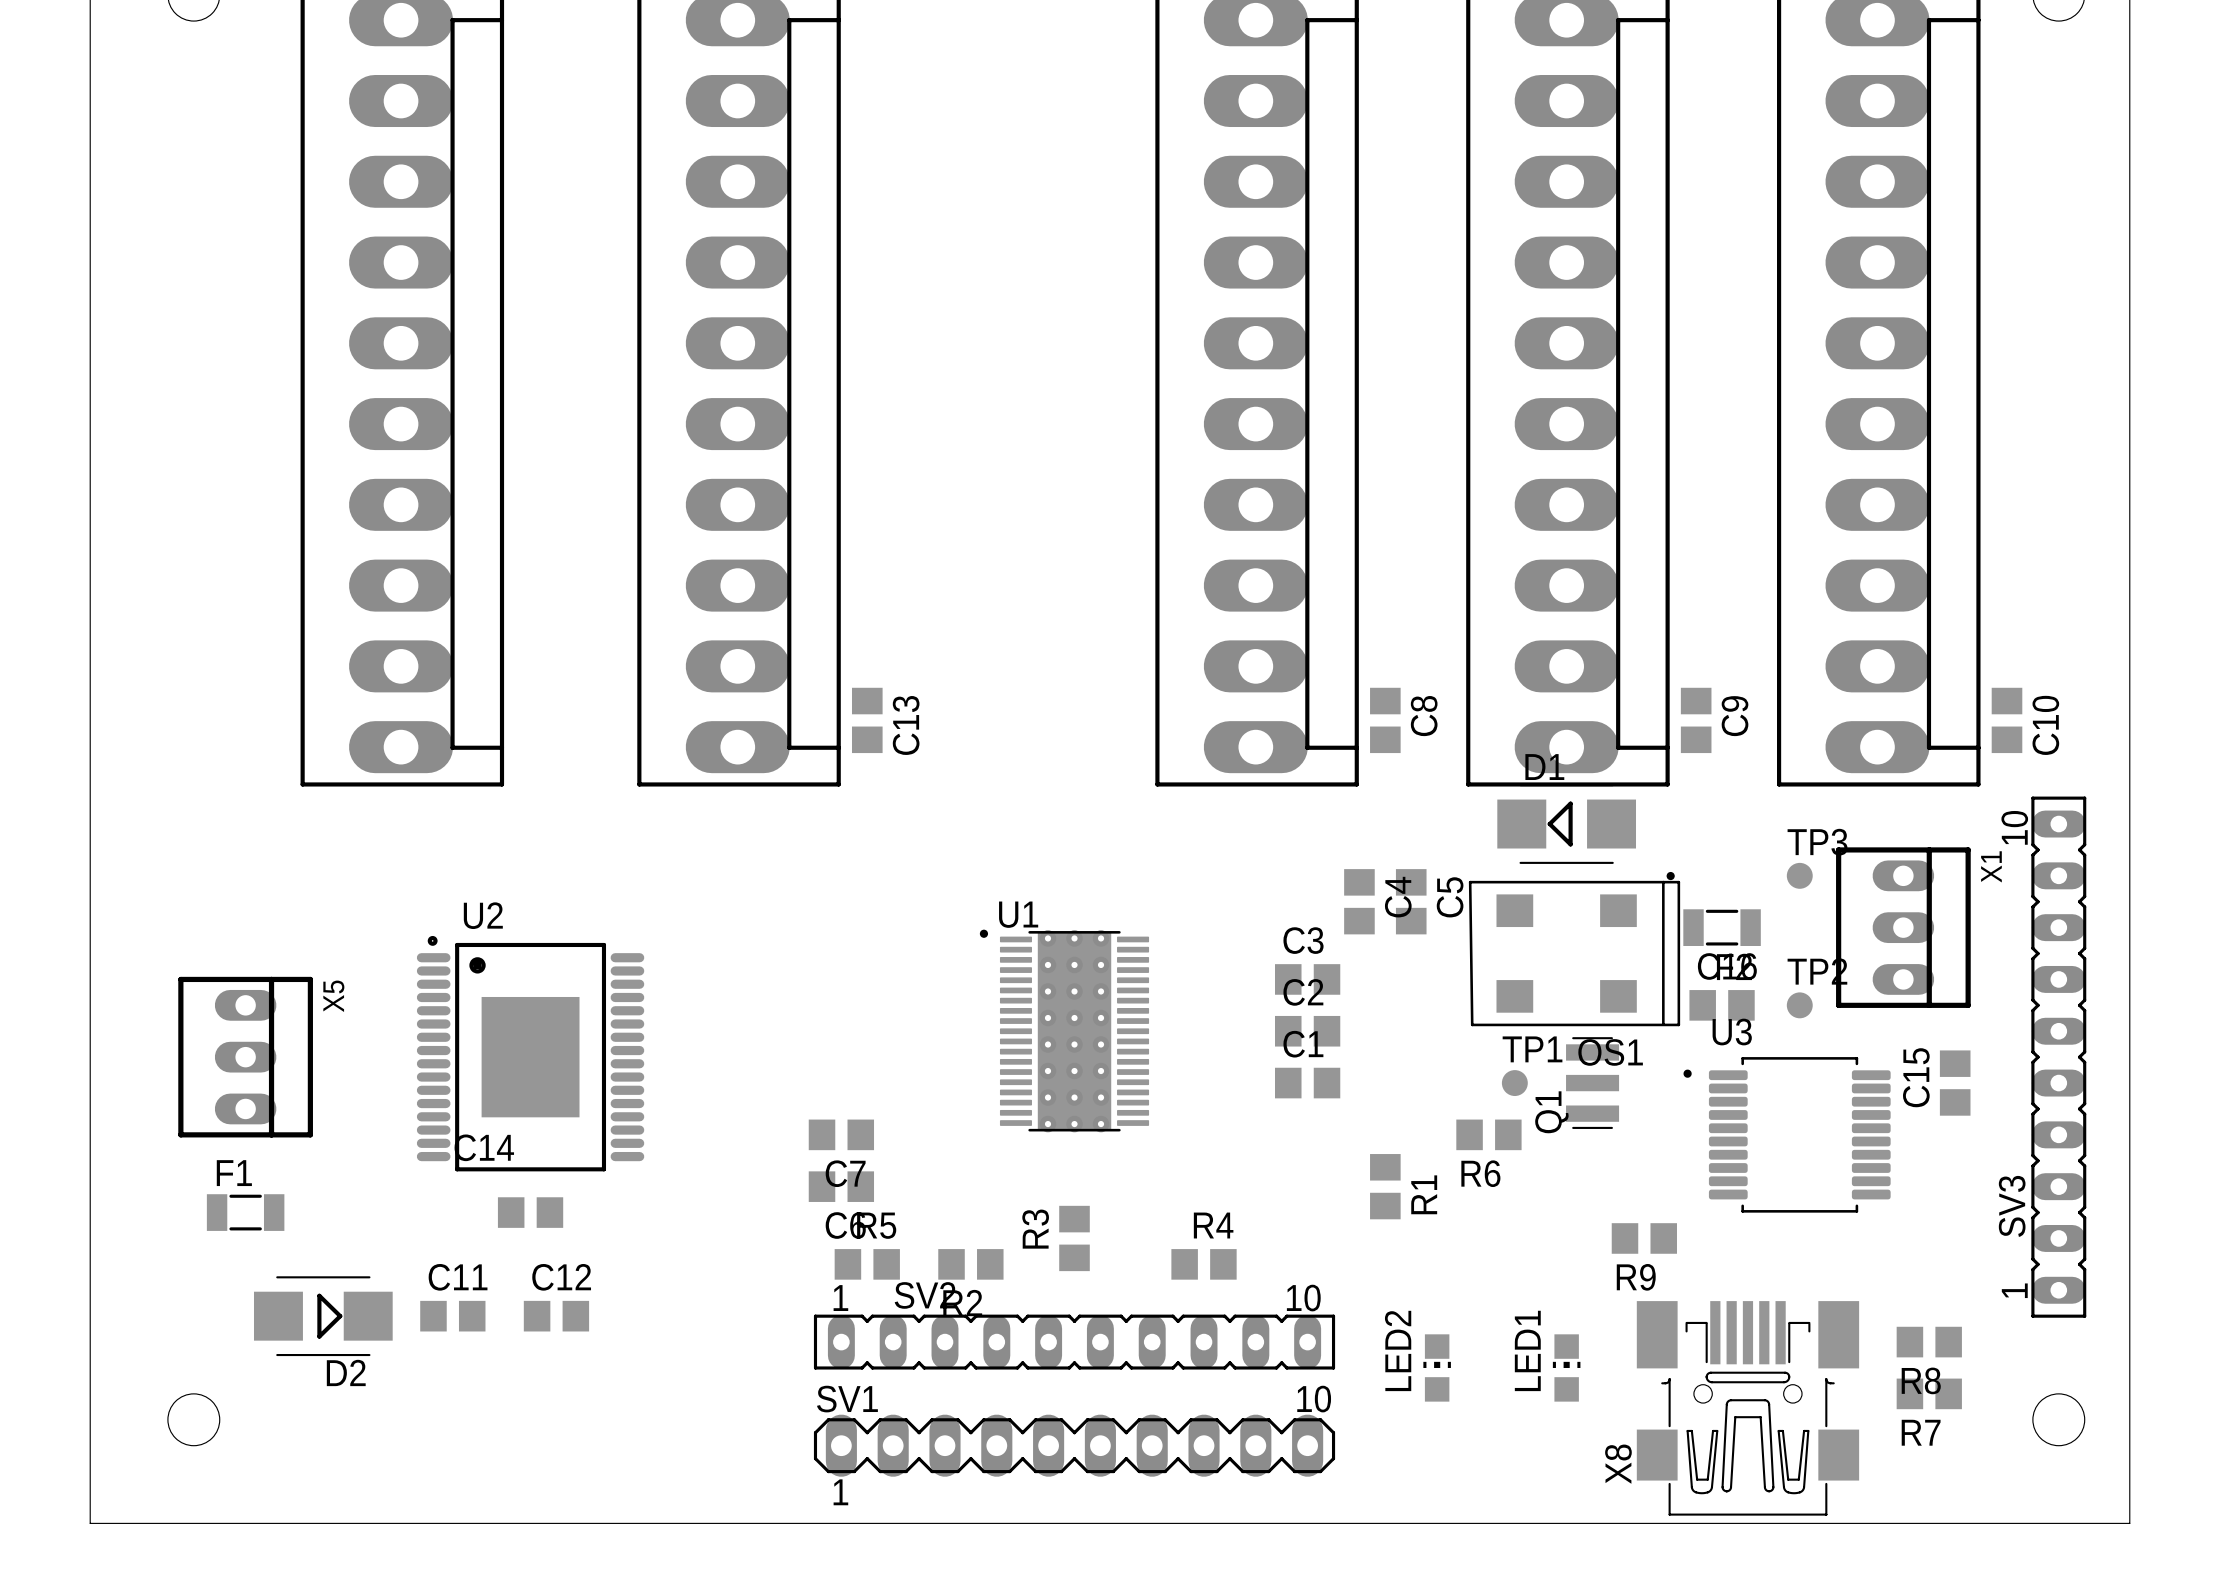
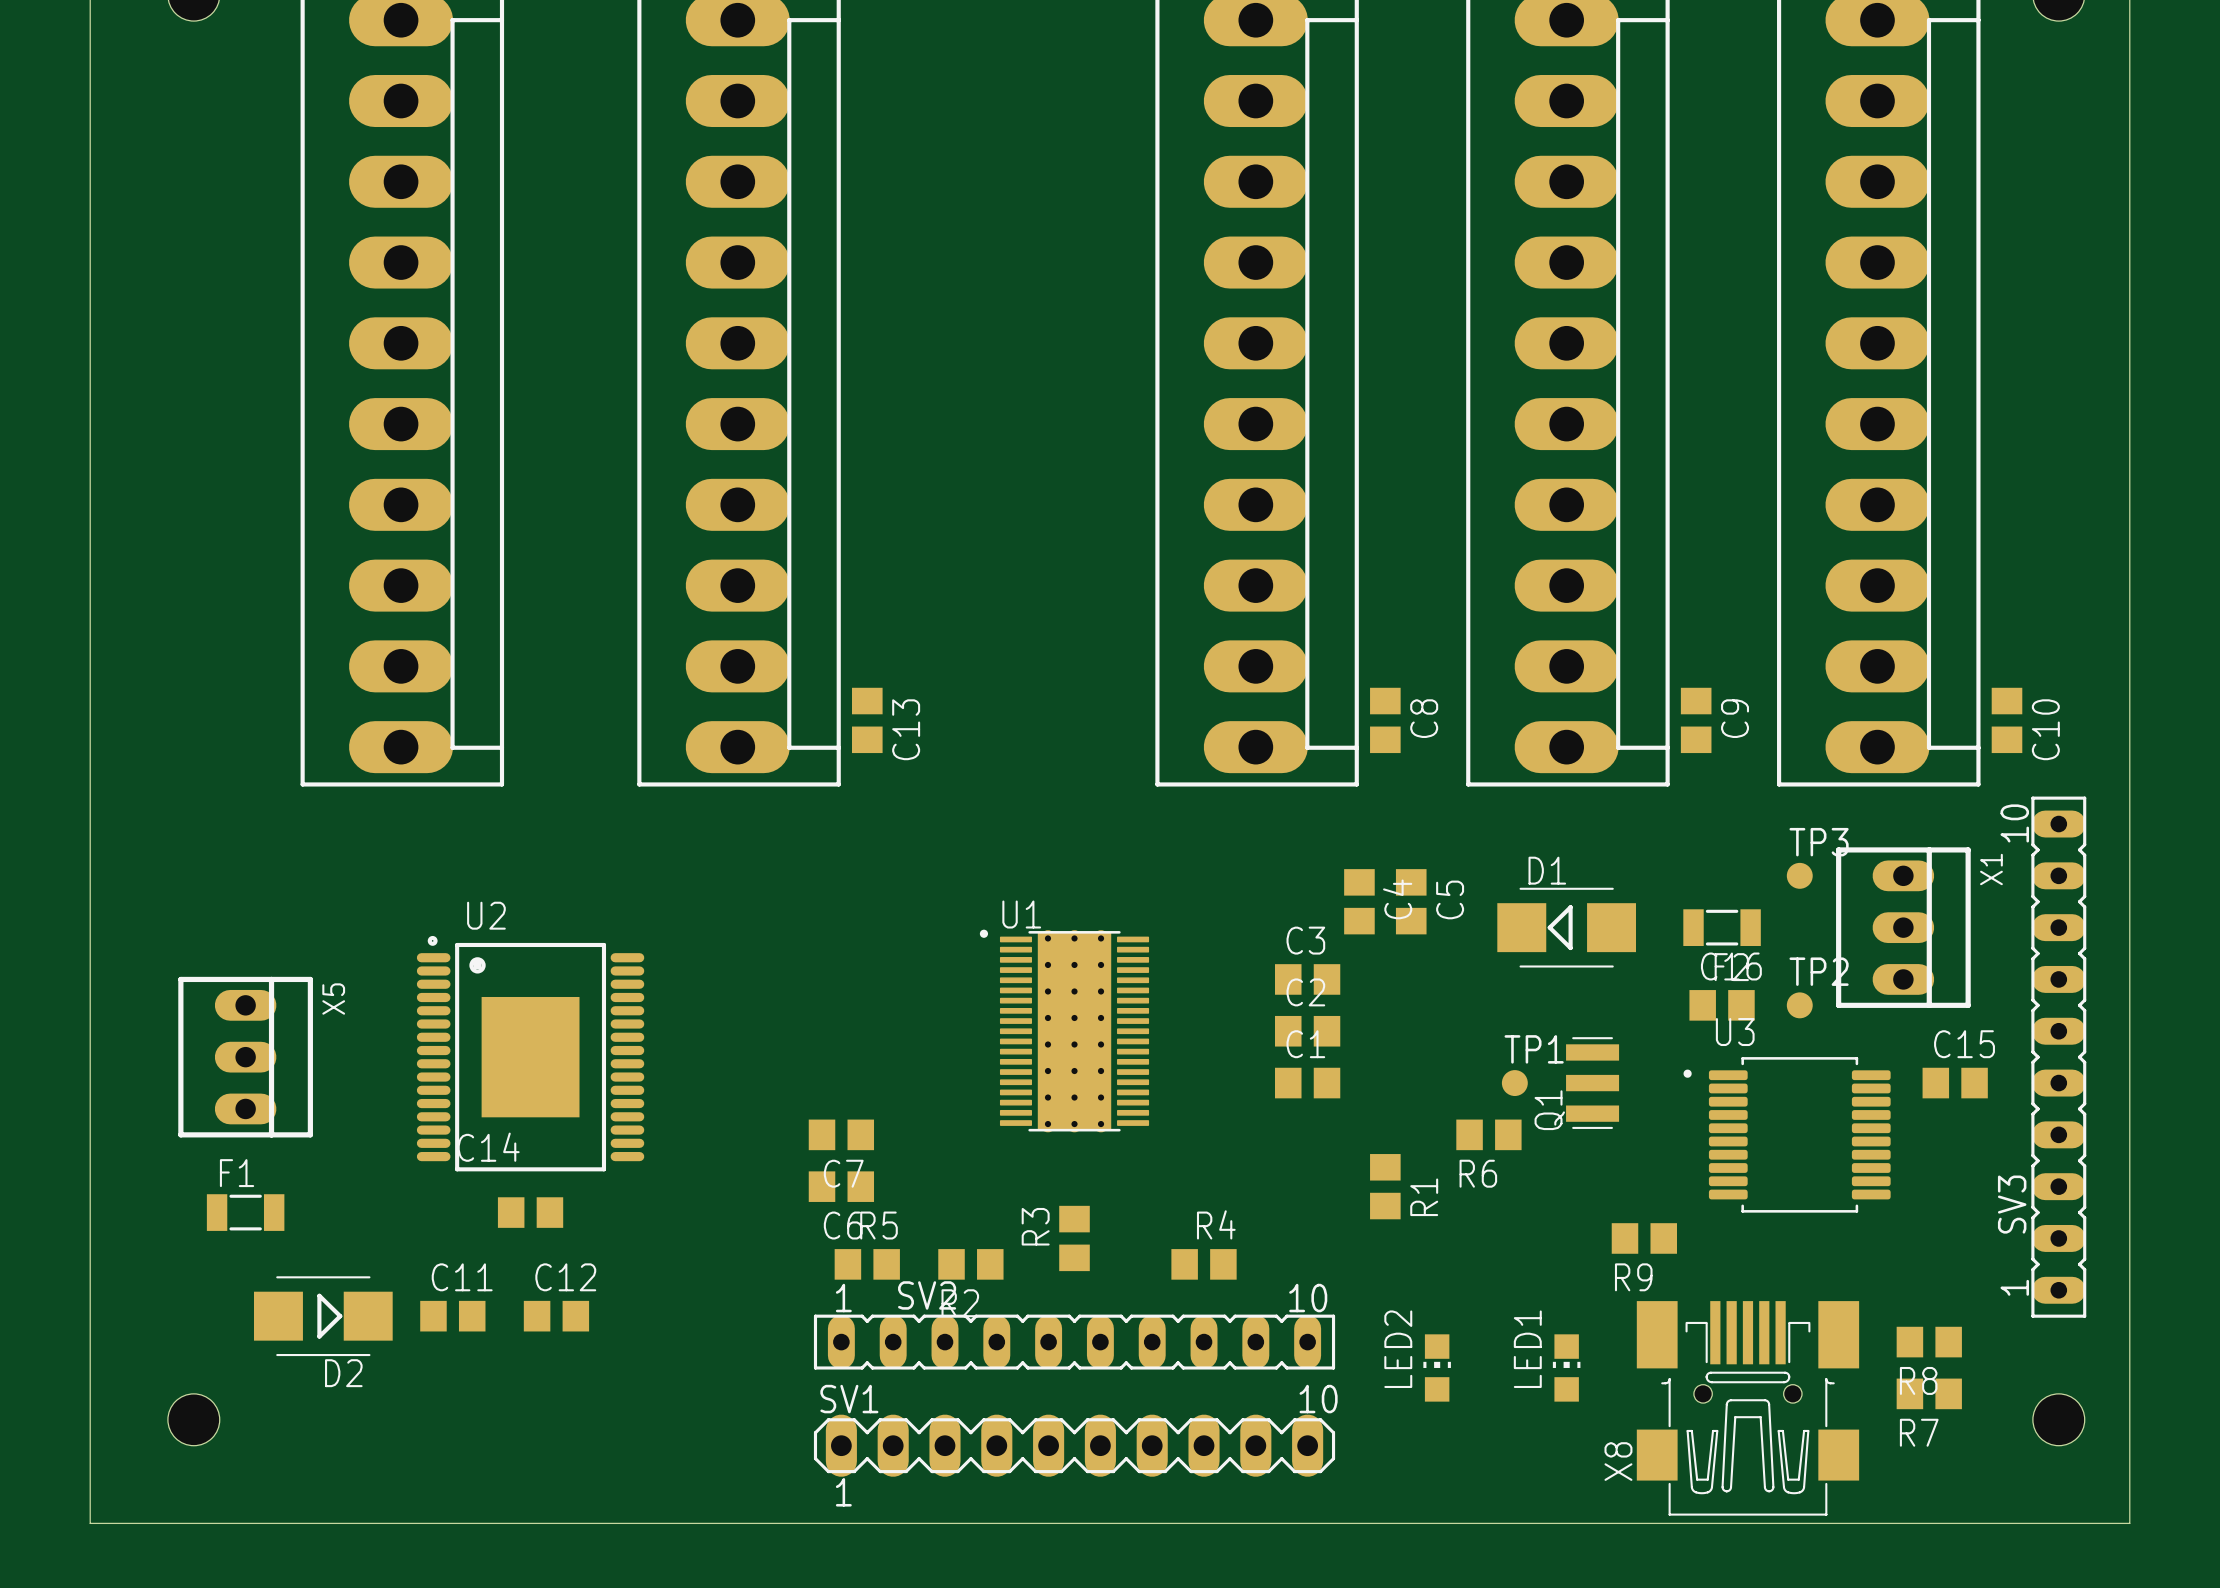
D1 position: (1566, 824) -> (1566, 927)
OS1: (1574, 949) -> none
C15 rotation: 0° (1955, 1083) -> 90° clockwise (1955, 1083)

